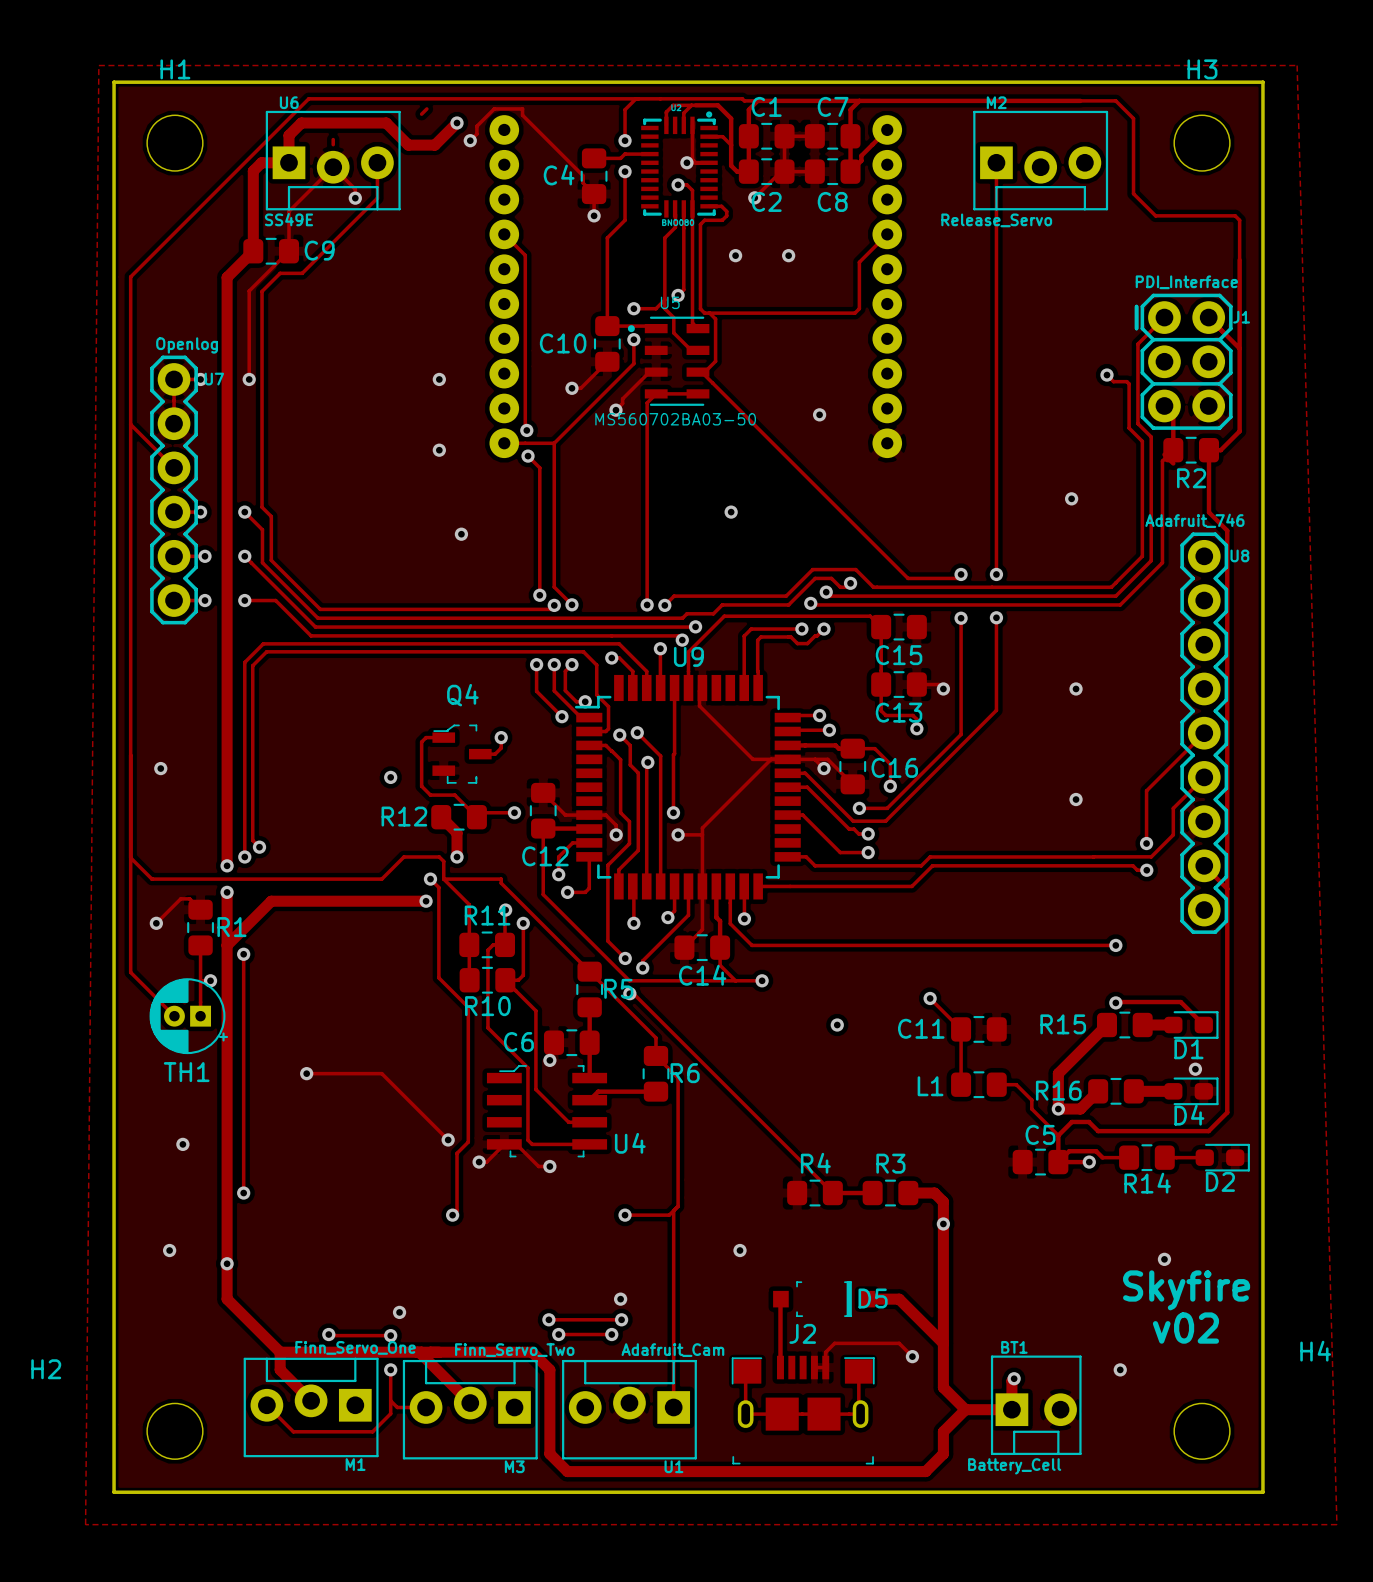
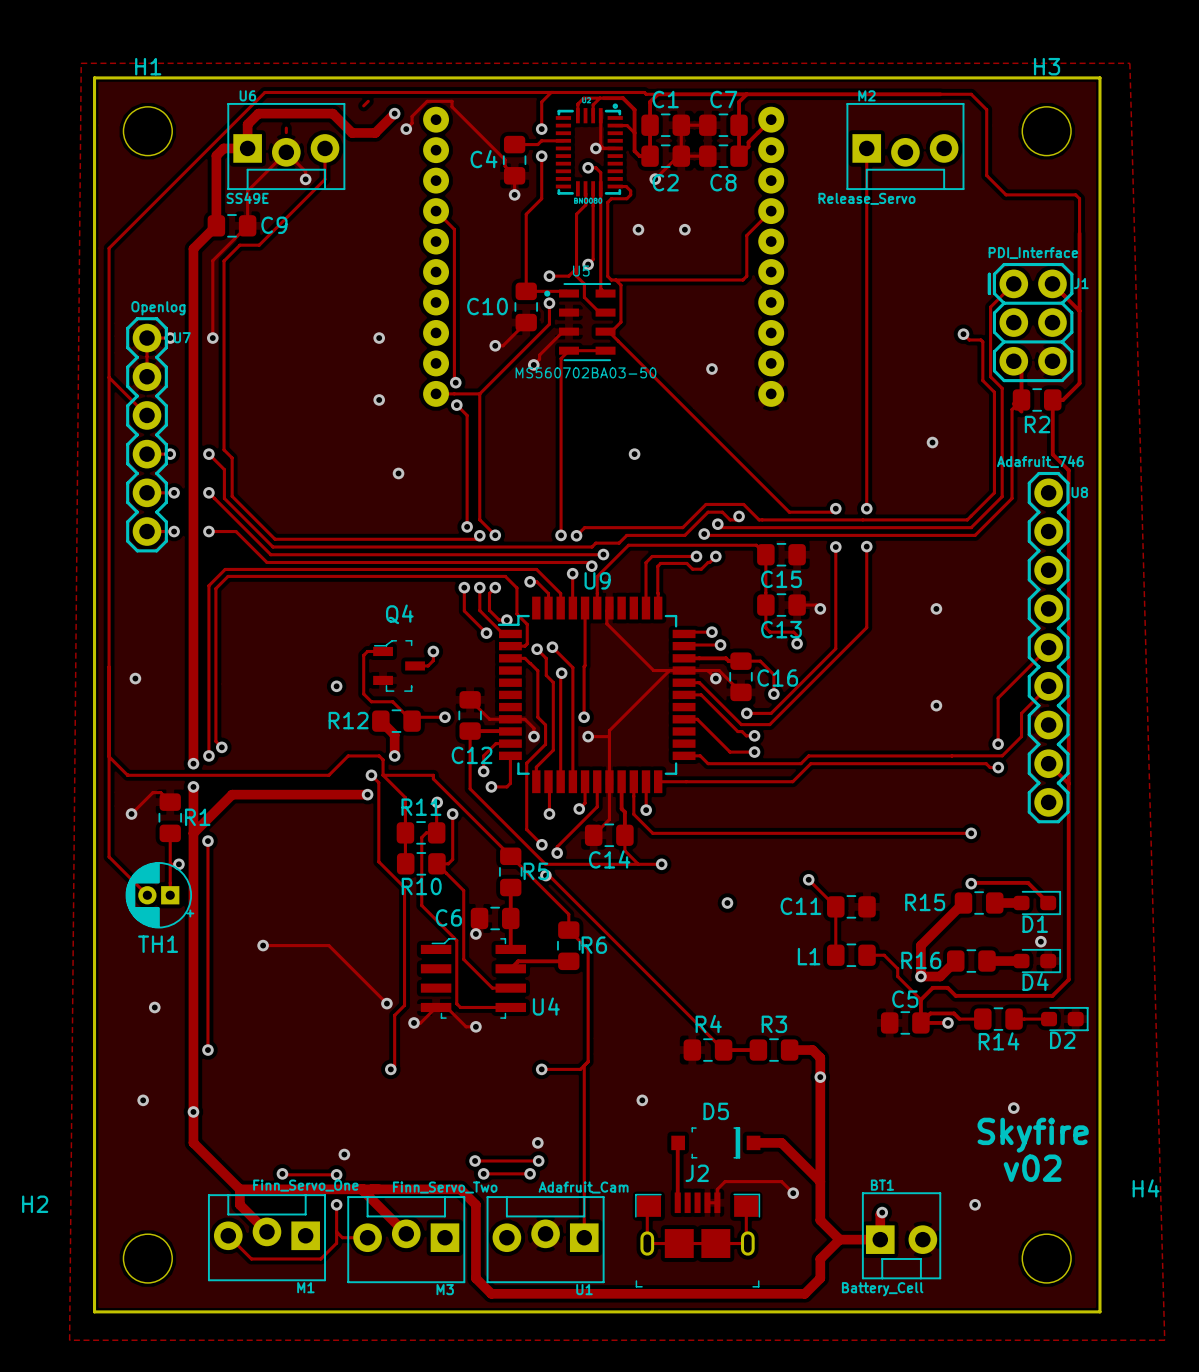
D5 name position: D5 (873, 1298) -> D5 (716, 1111)

